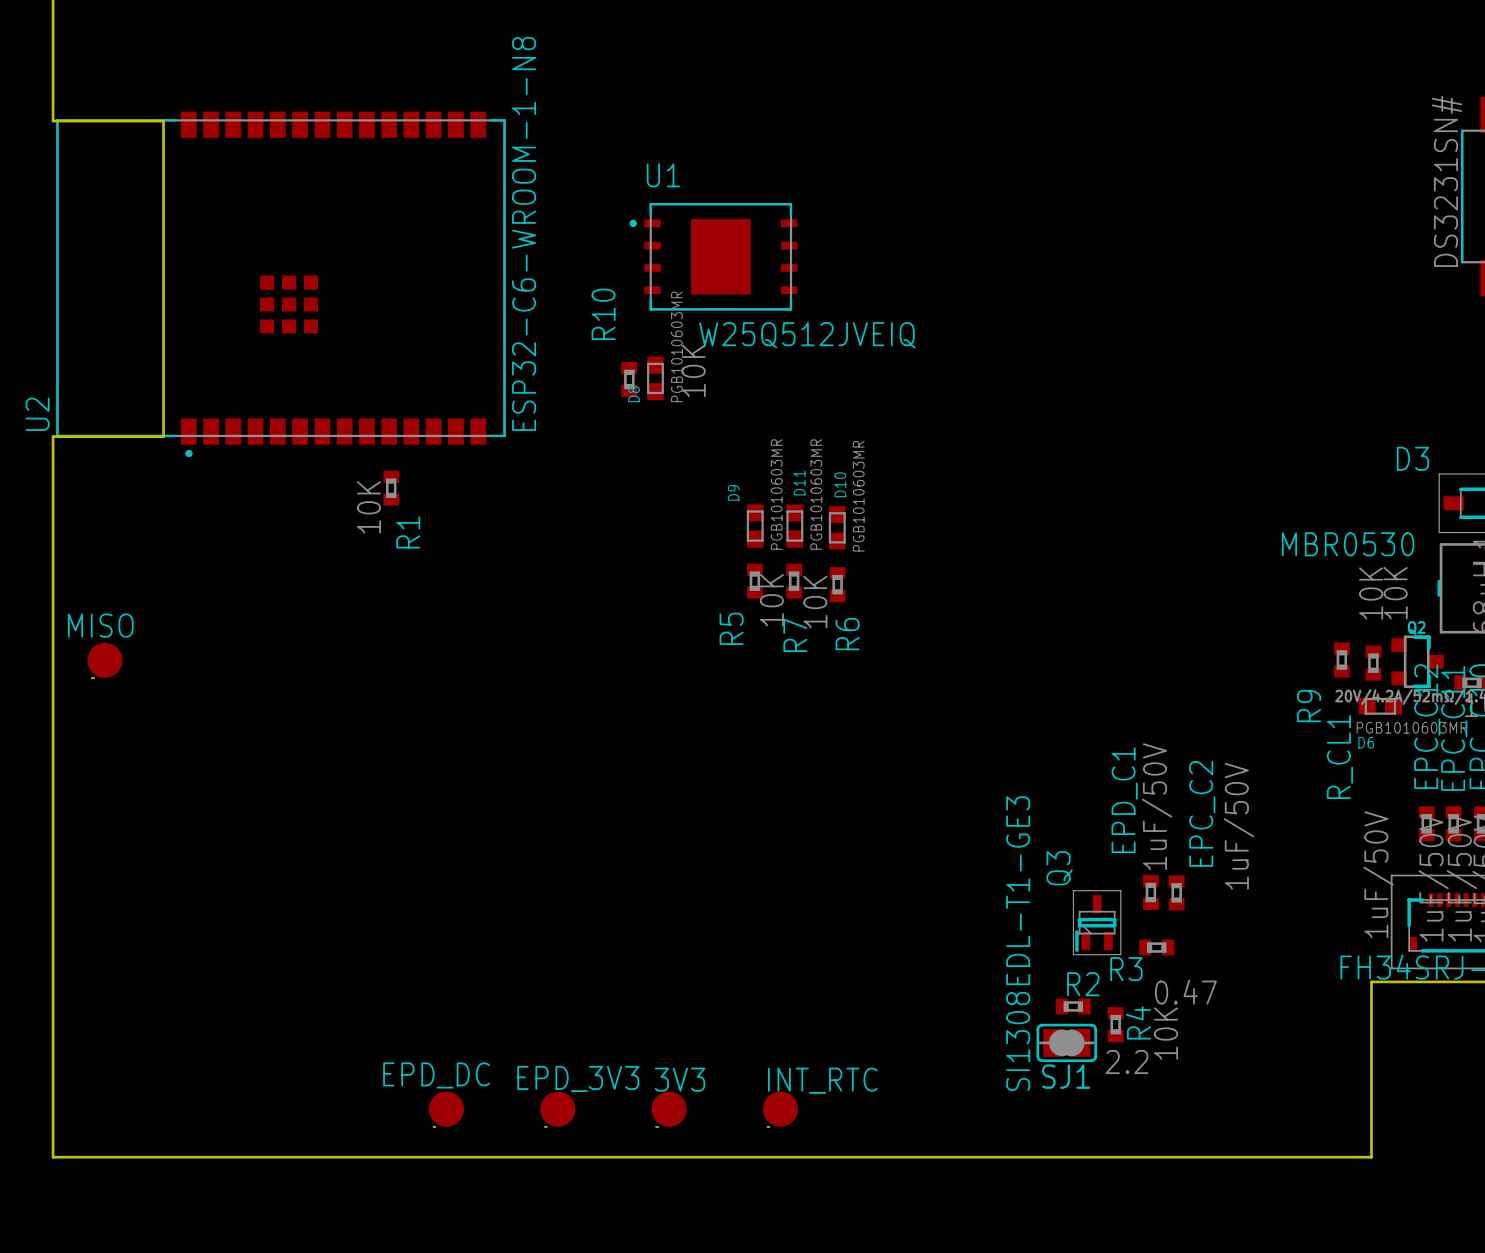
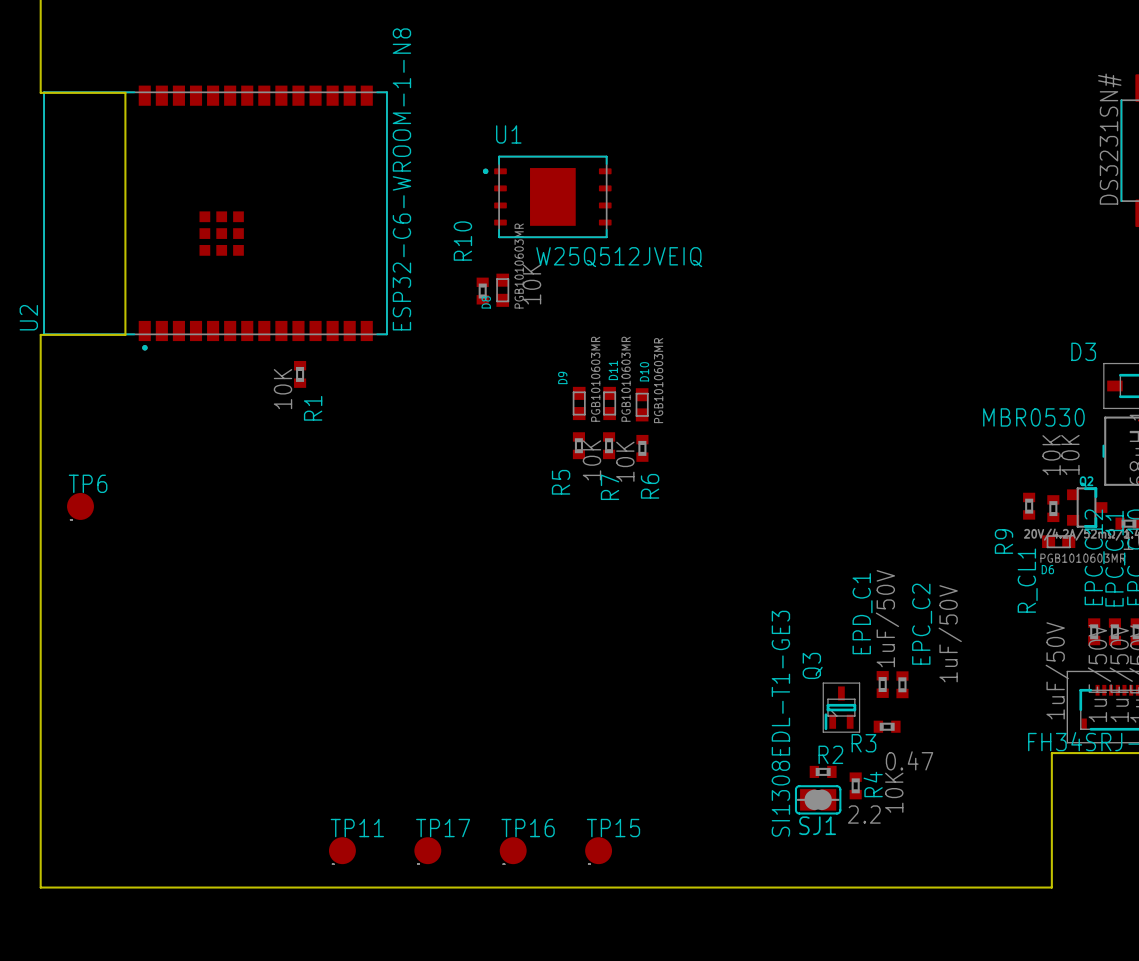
MISO name: MISO (100, 625) -> TP6 (88, 483)
EPD_DC name: EPD_DC (436, 1075) -> TP11 (357, 828)
EPD_3V3 name: EPD_3V3 (578, 1078) -> TP17 (443, 828)
3V3 name: 3V3 (679, 1079) -> TP16 (528, 828)
INT_RTC name: INT_RTC (822, 1080) -> TP15 (613, 828)

